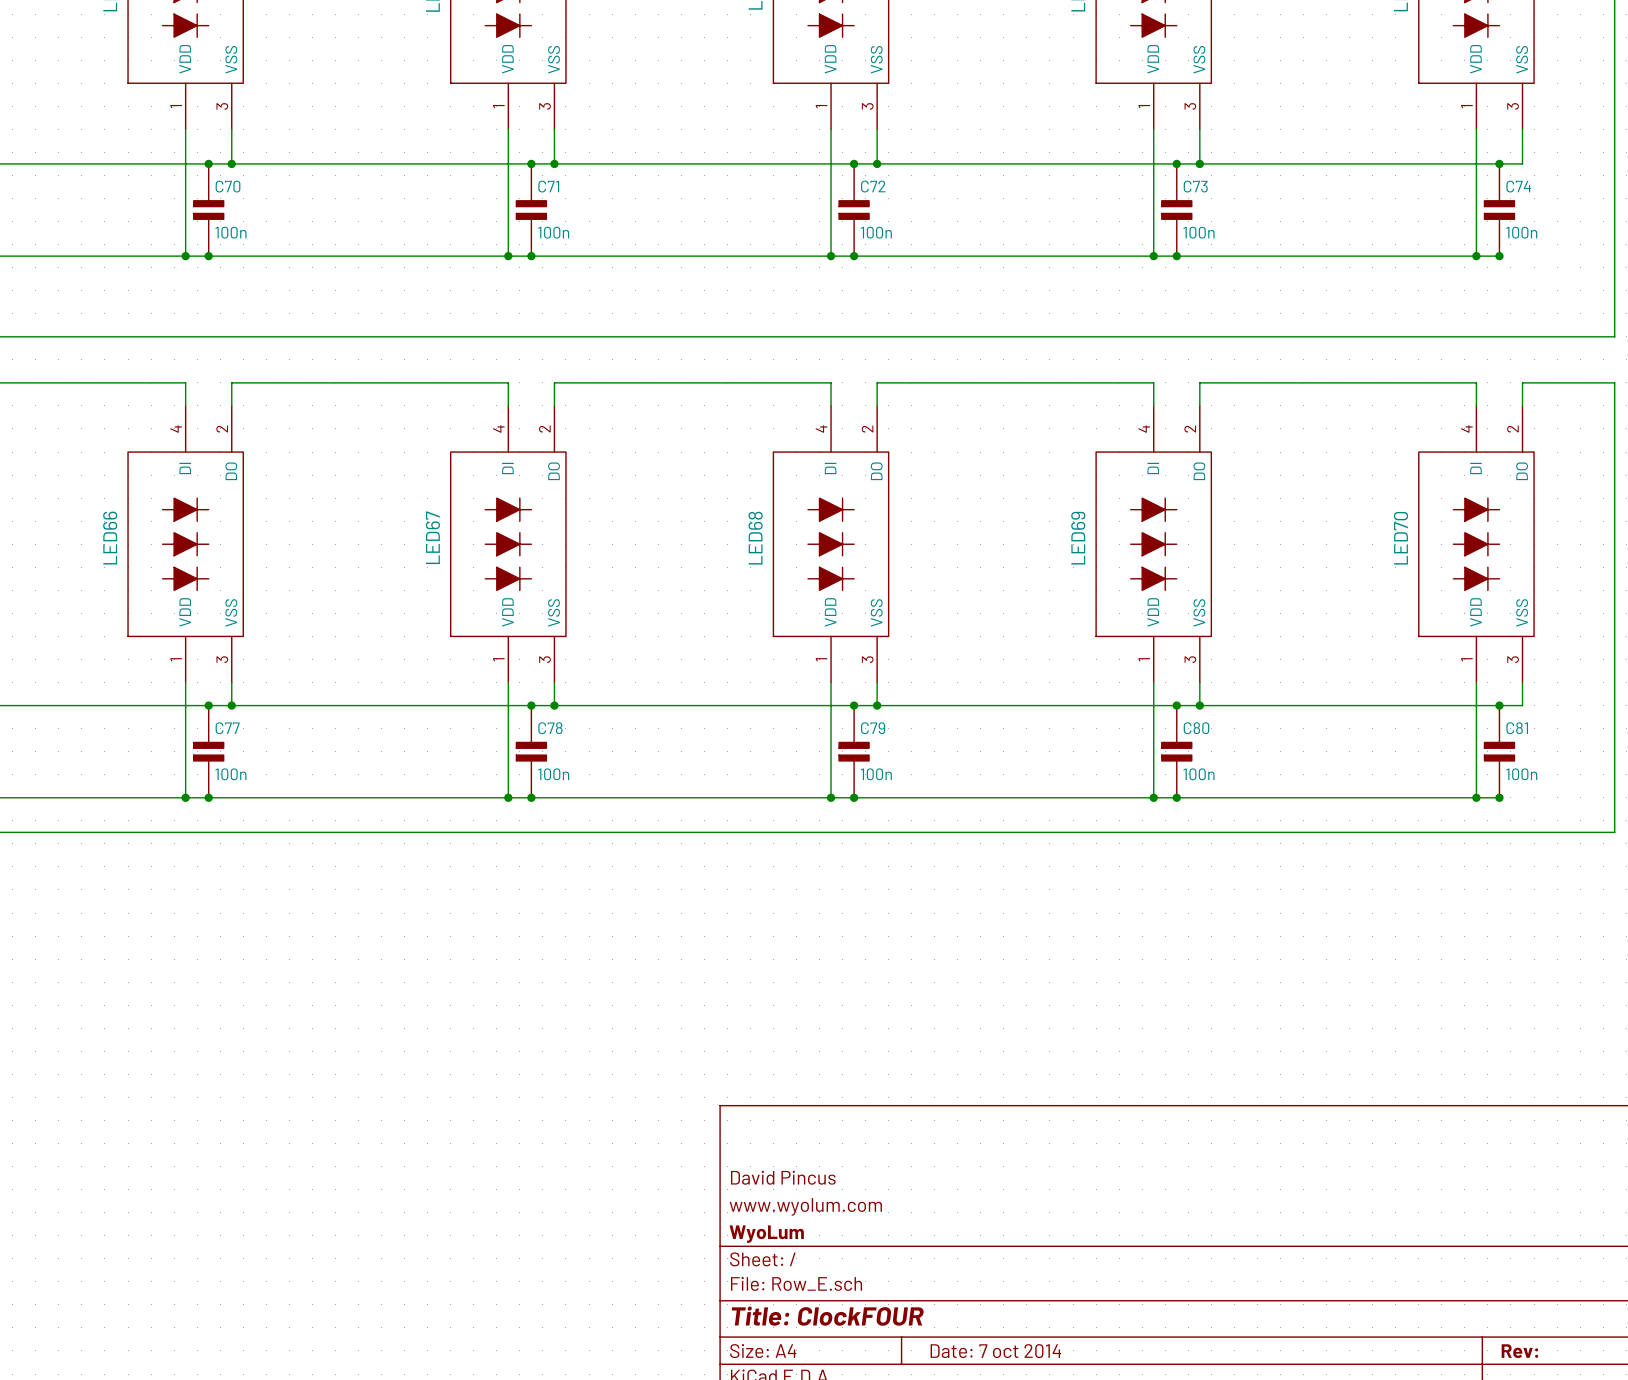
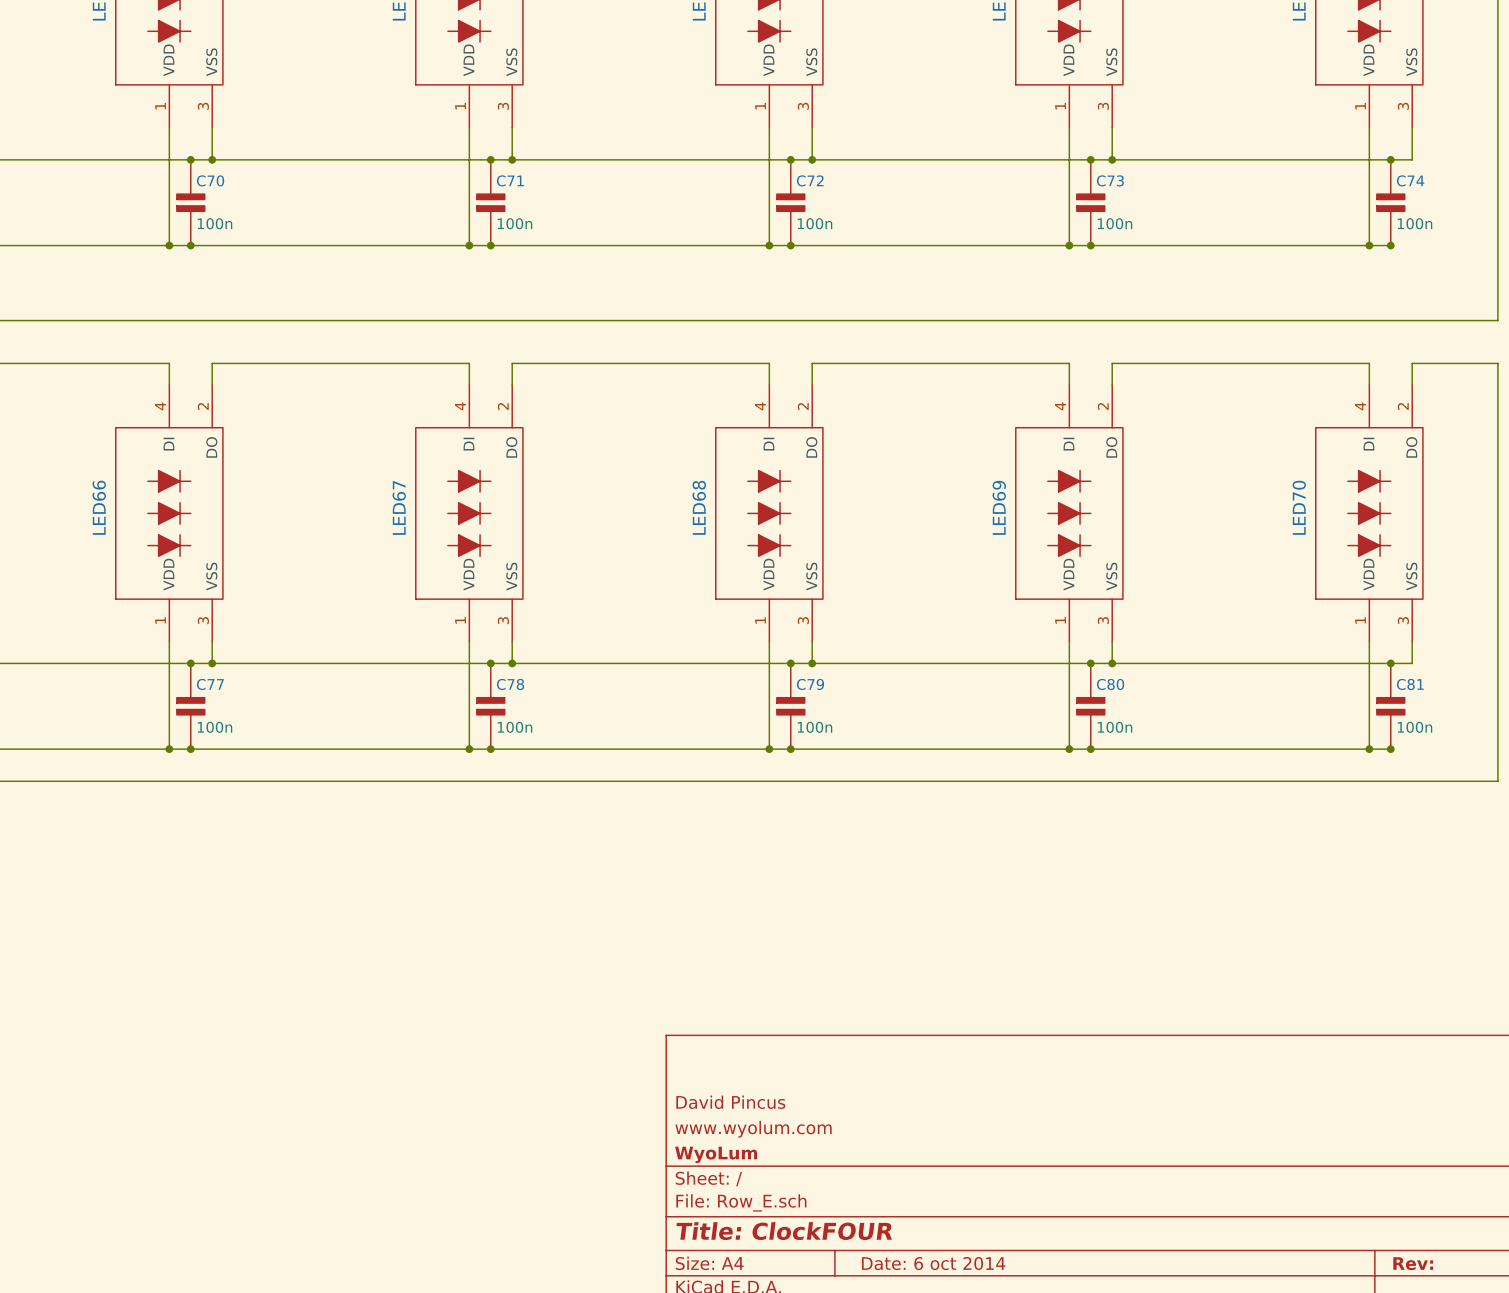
title block: Date: 7 oct 2014 (995, 1351) -> Date: 6 oct 2014 (933, 1263)

